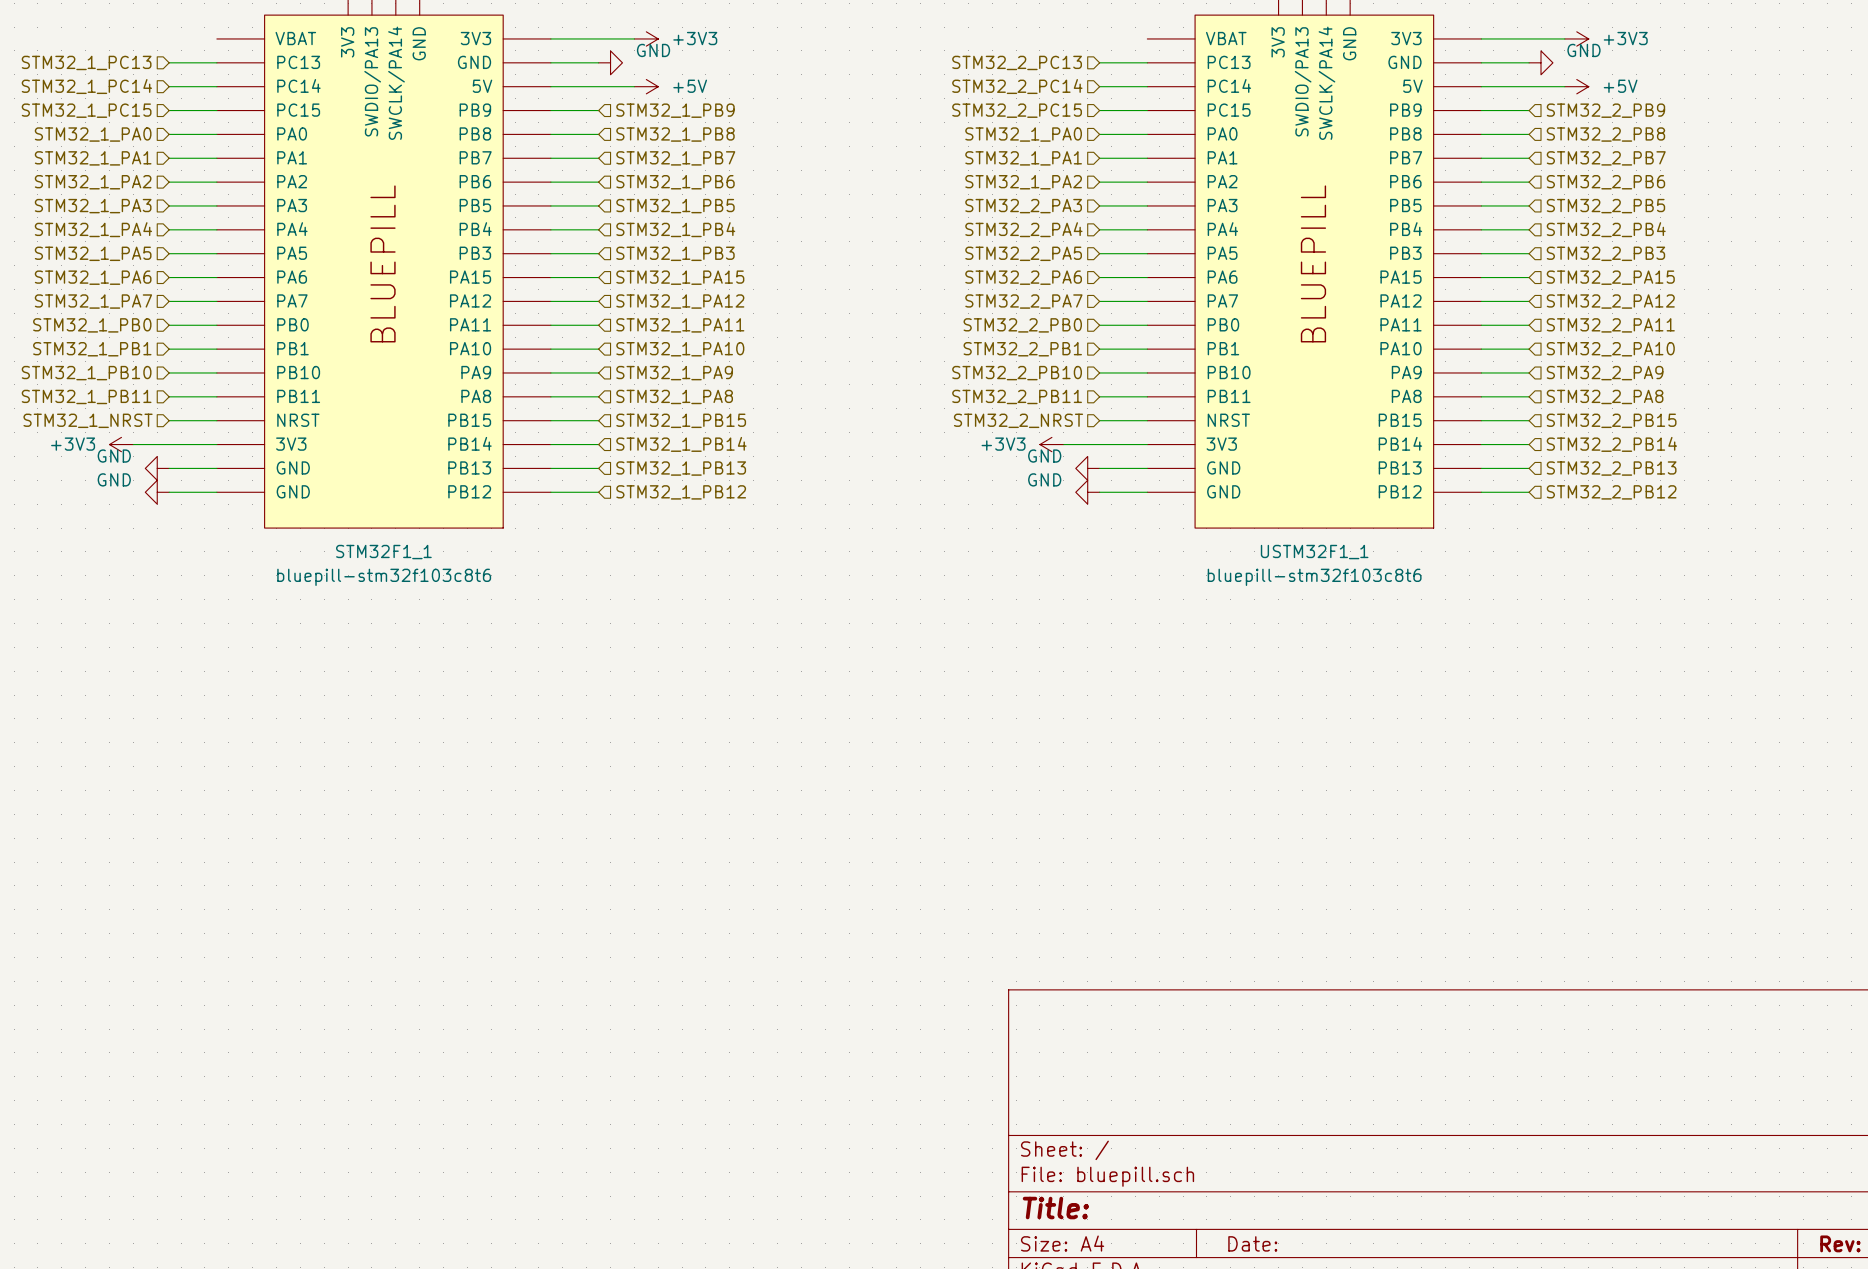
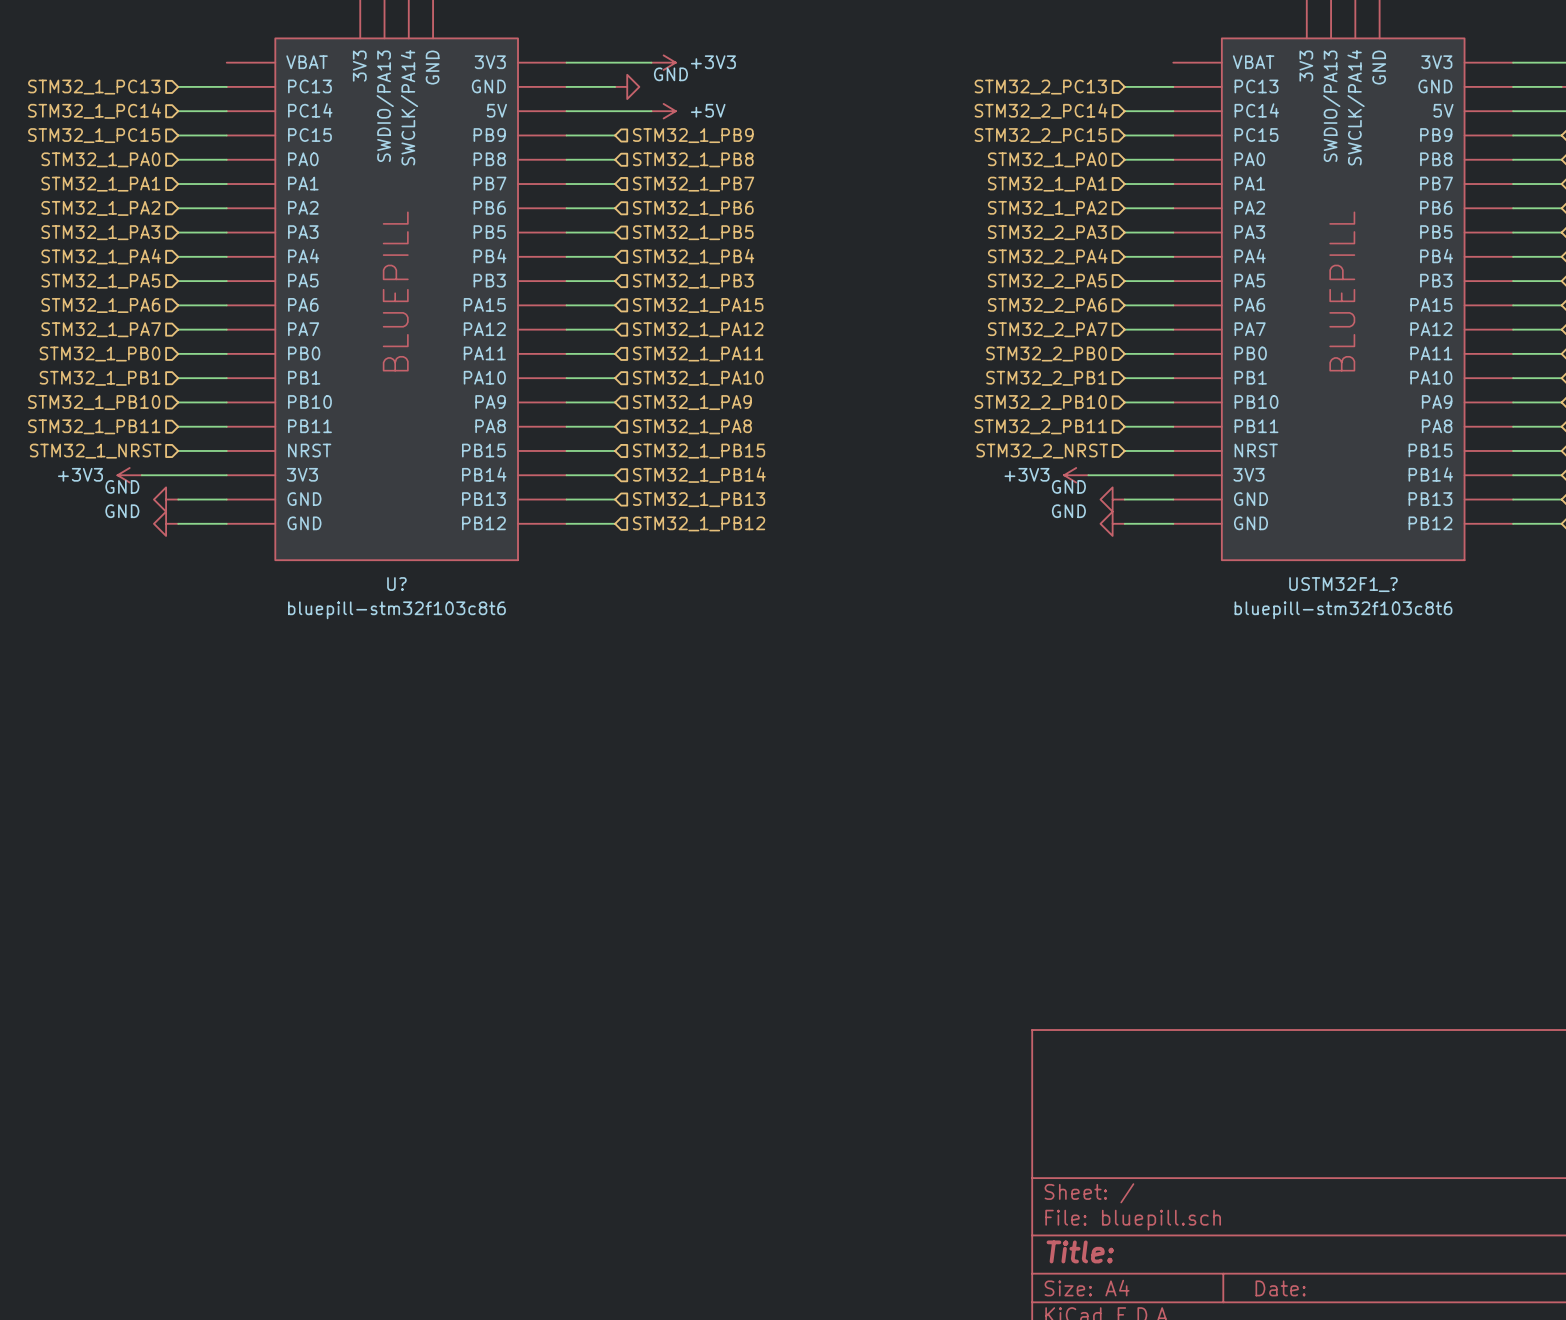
STM32F1_1 name: STM32F1_1 (383, 552) -> U? (396, 584)
USTM32F1_1 name: USTM32F1_1 (1314, 552) -> USTM32F1_? (1343, 584)

